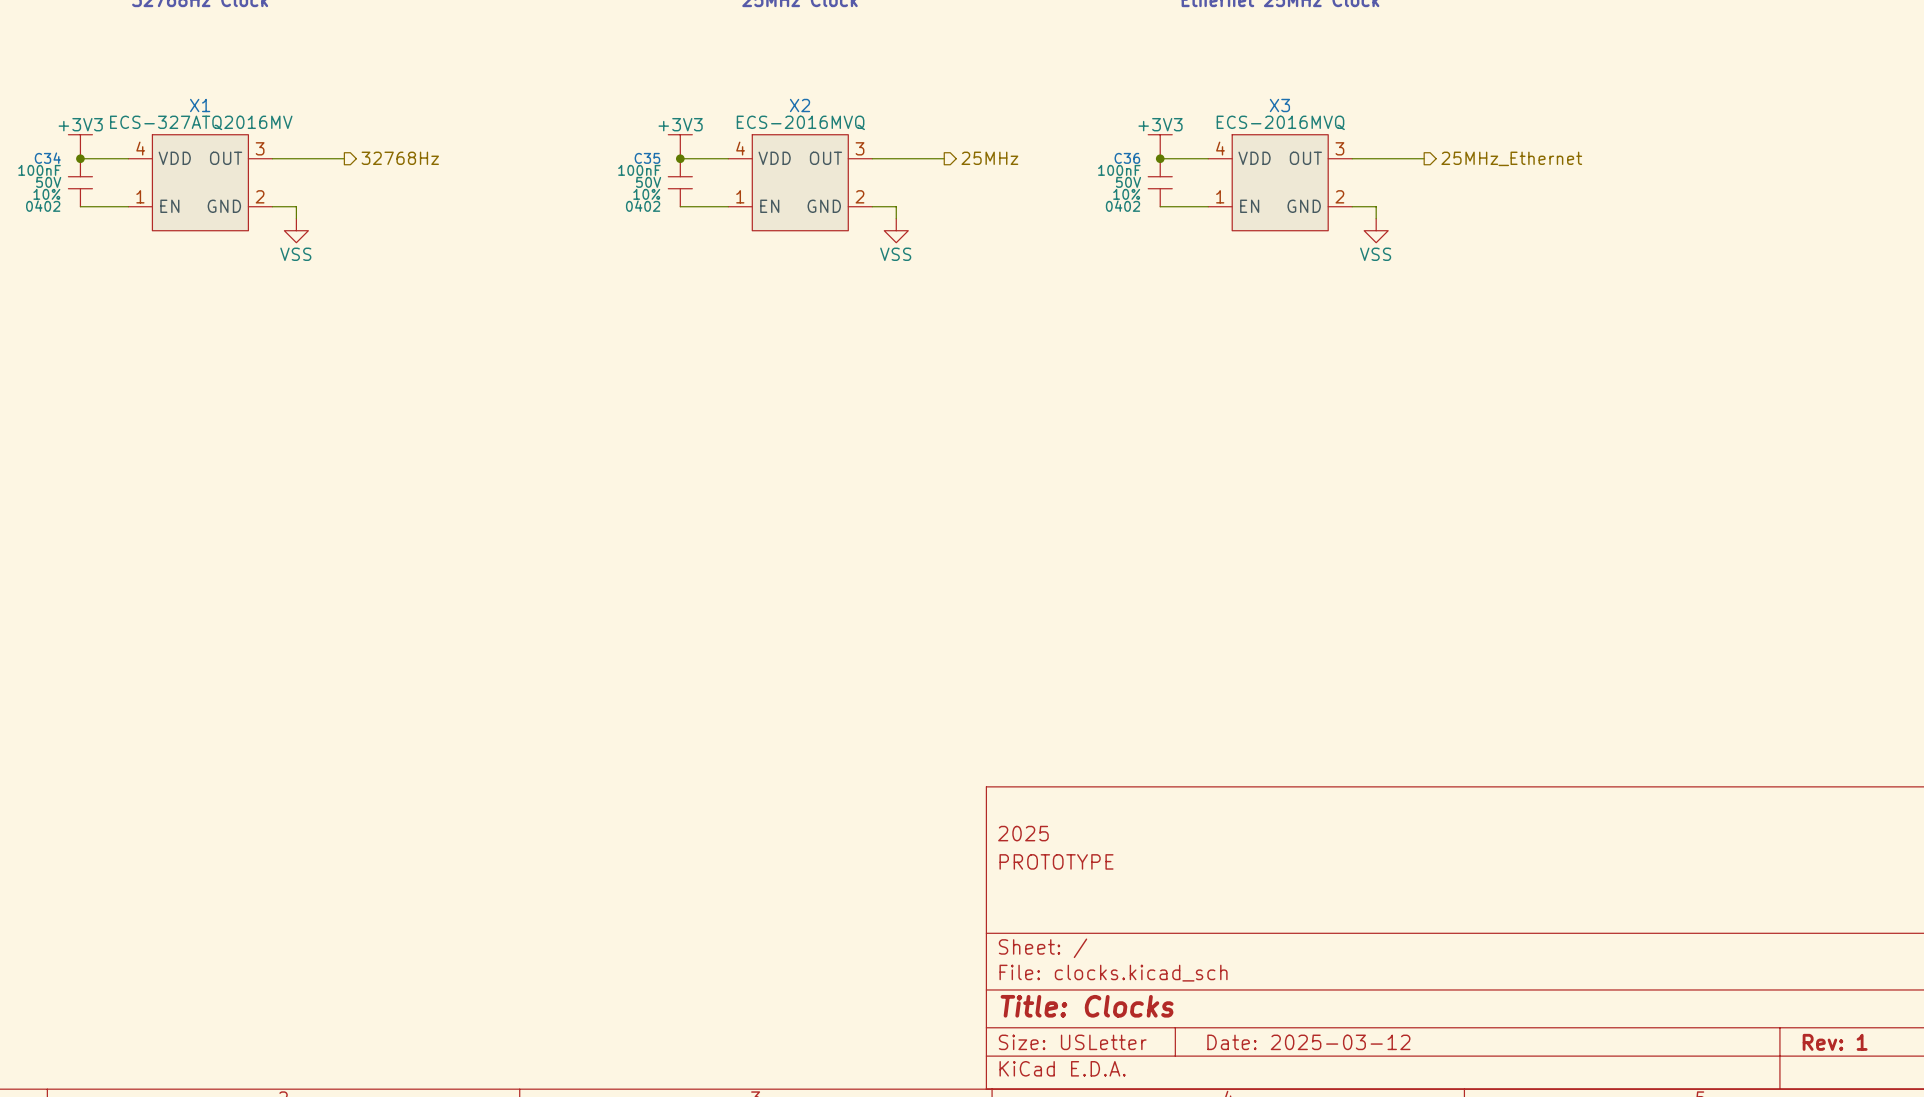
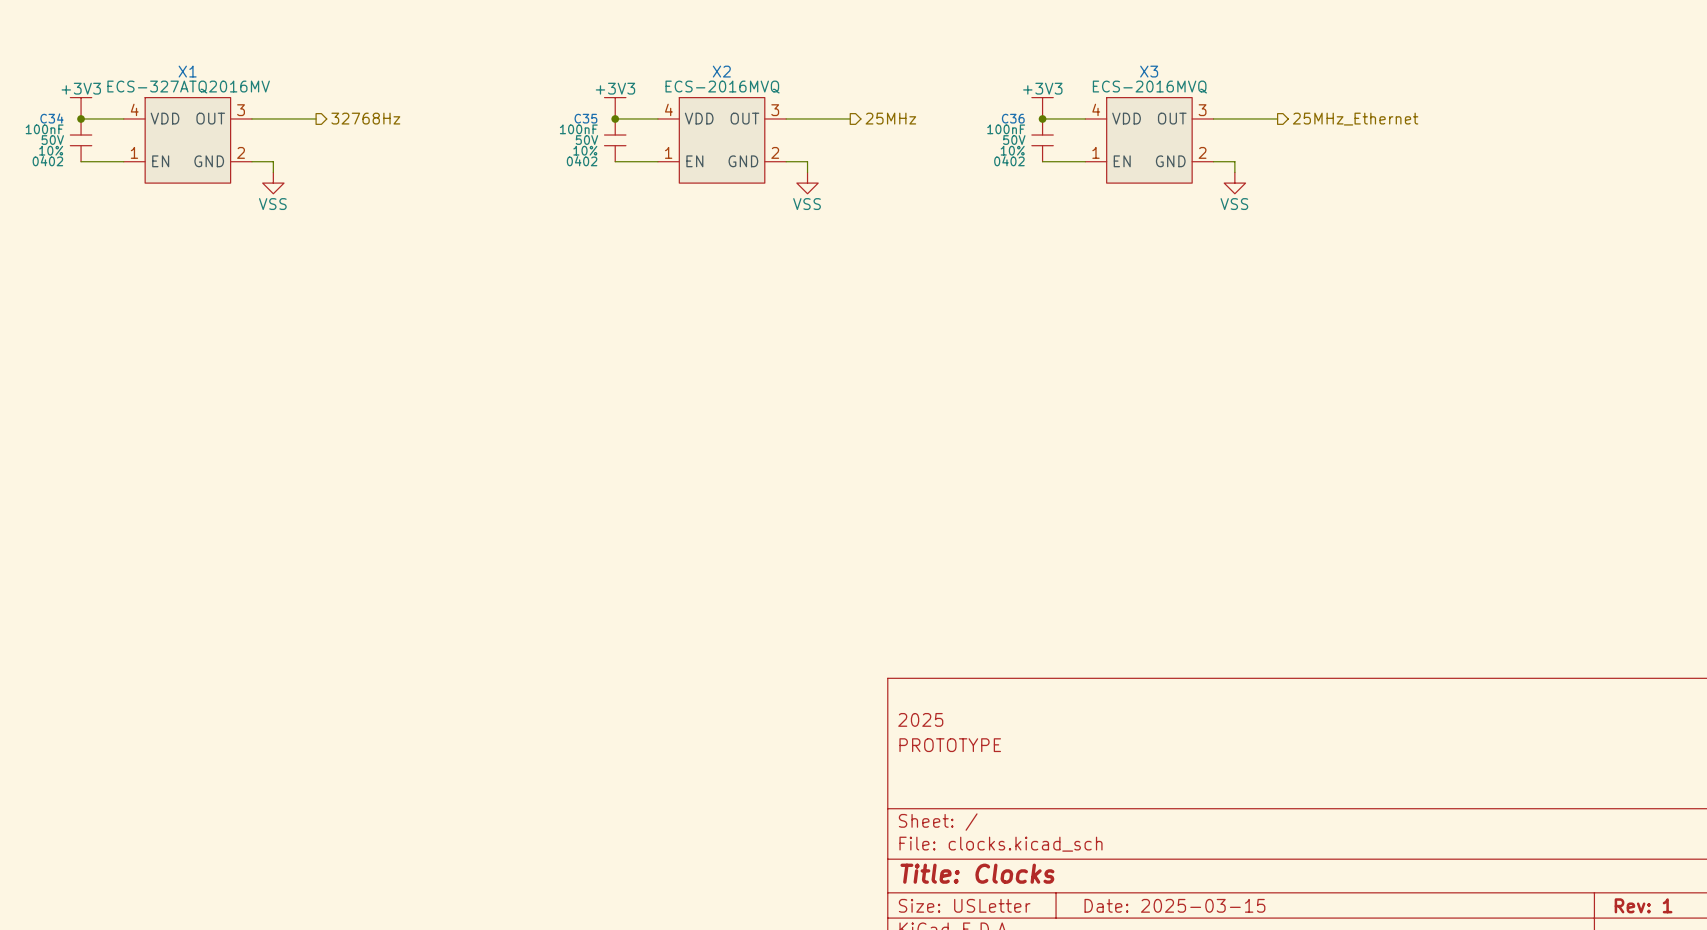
title block: Date: 2025-03-12 (1308, 1042) -> Date: 2025-03-15 (1174, 905)

